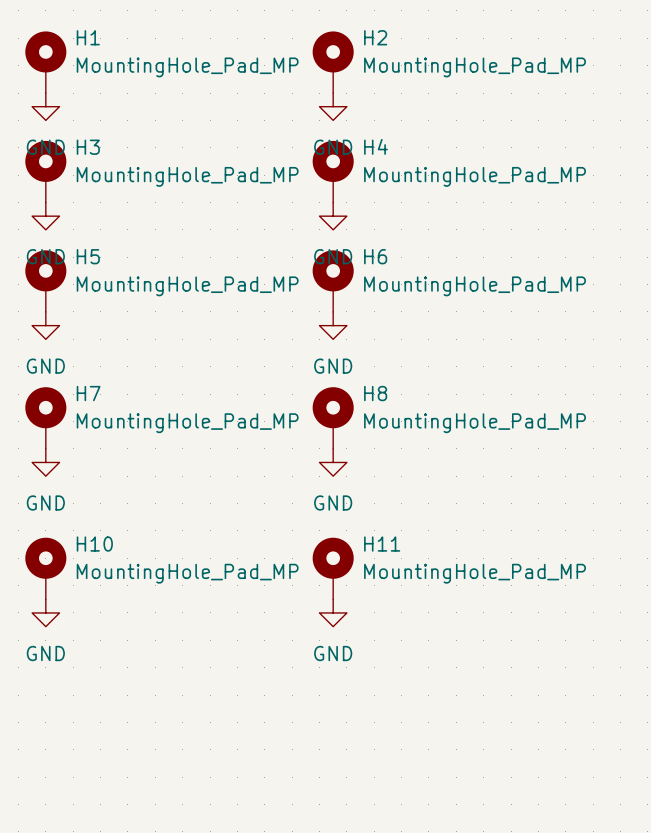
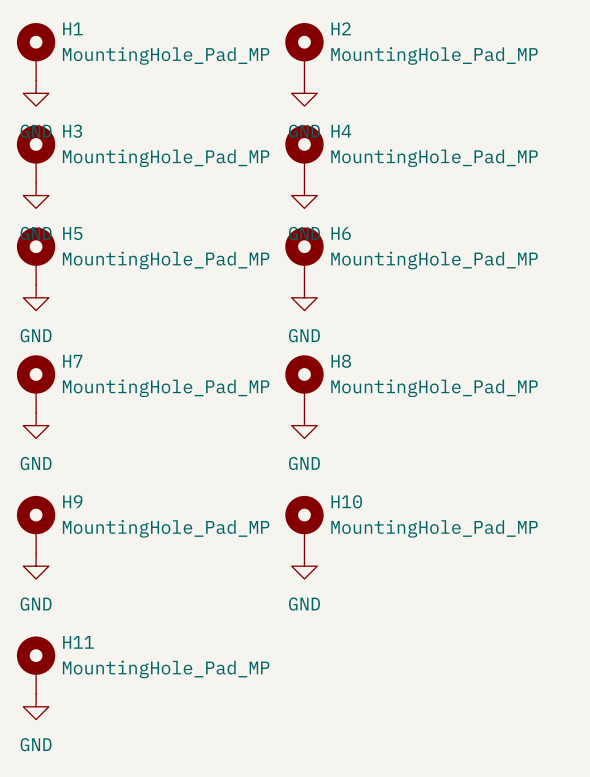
H10 name: H10 (94, 544) -> H9 (72, 501)
H11 name: H11 (382, 544) -> H10 (346, 501)
H11: none -> MountingHole_Pad_MP (36, 665)
power symbol: none -> GND (36, 706)

